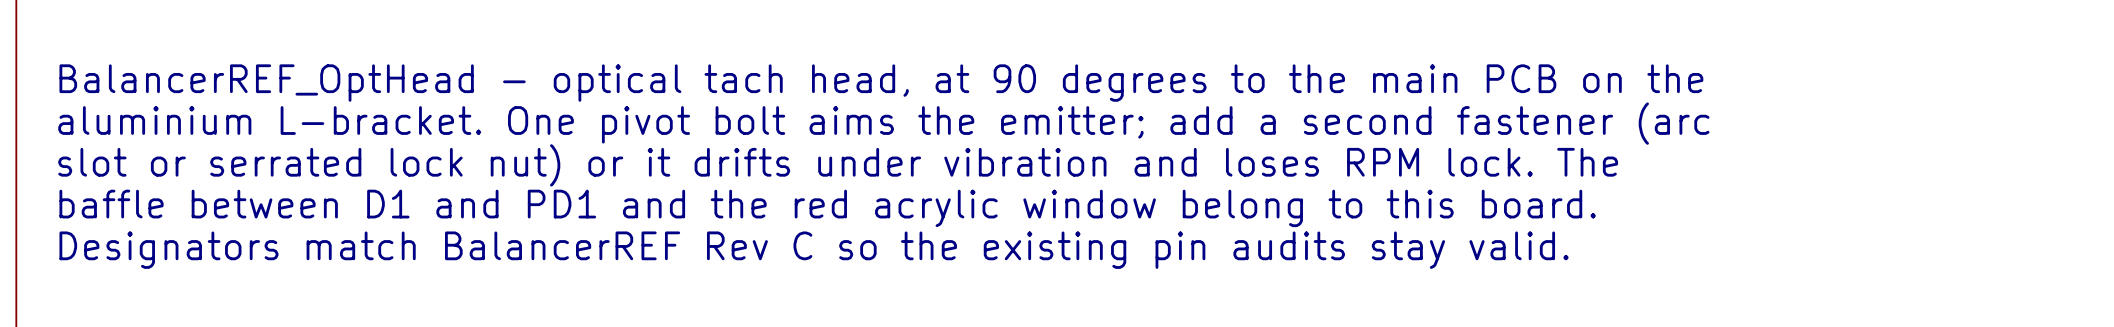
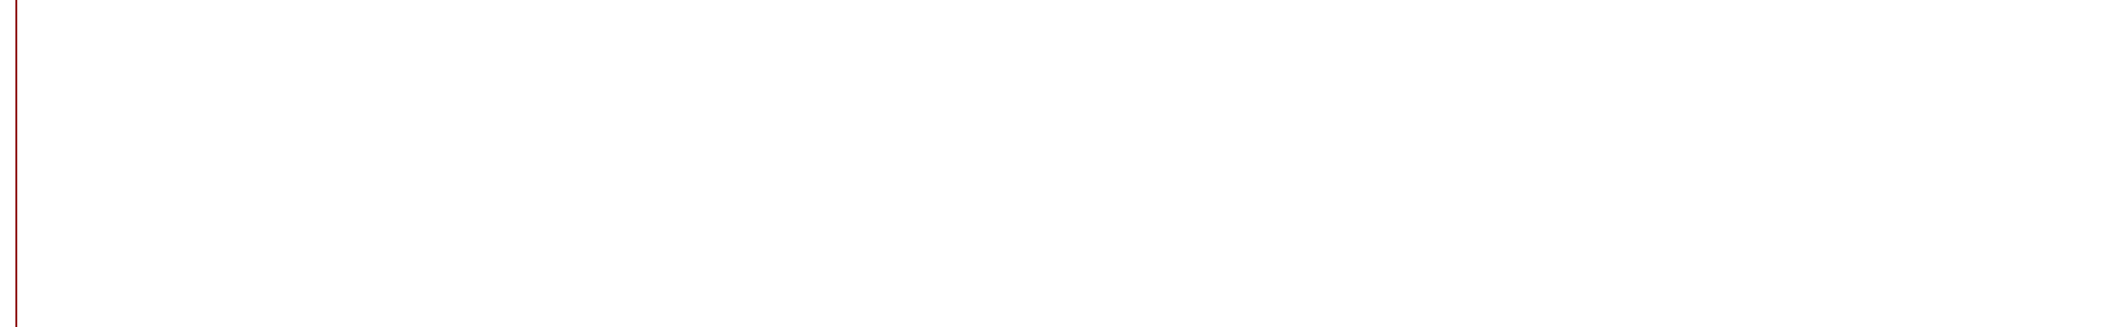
text: BalancerREF_OptHead - optical tach head, at 90 degrees to the main PCB on the (881, 83) -> none
text: aluminium L-bracket. One pivot bolt aims the emitter; add a second fastener (arc (883, 123) -> none
text: slot or serrated lock nut) or it drifts under vibration and loses RPM lock. The (838, 165) -> none
text: baffle between D1 and PD1 and the red acrylic window belong to this board. (827, 208) -> none
text: Designators match BalancerREF Rev C so the existing pin audits stay valid. (814, 250) -> none

